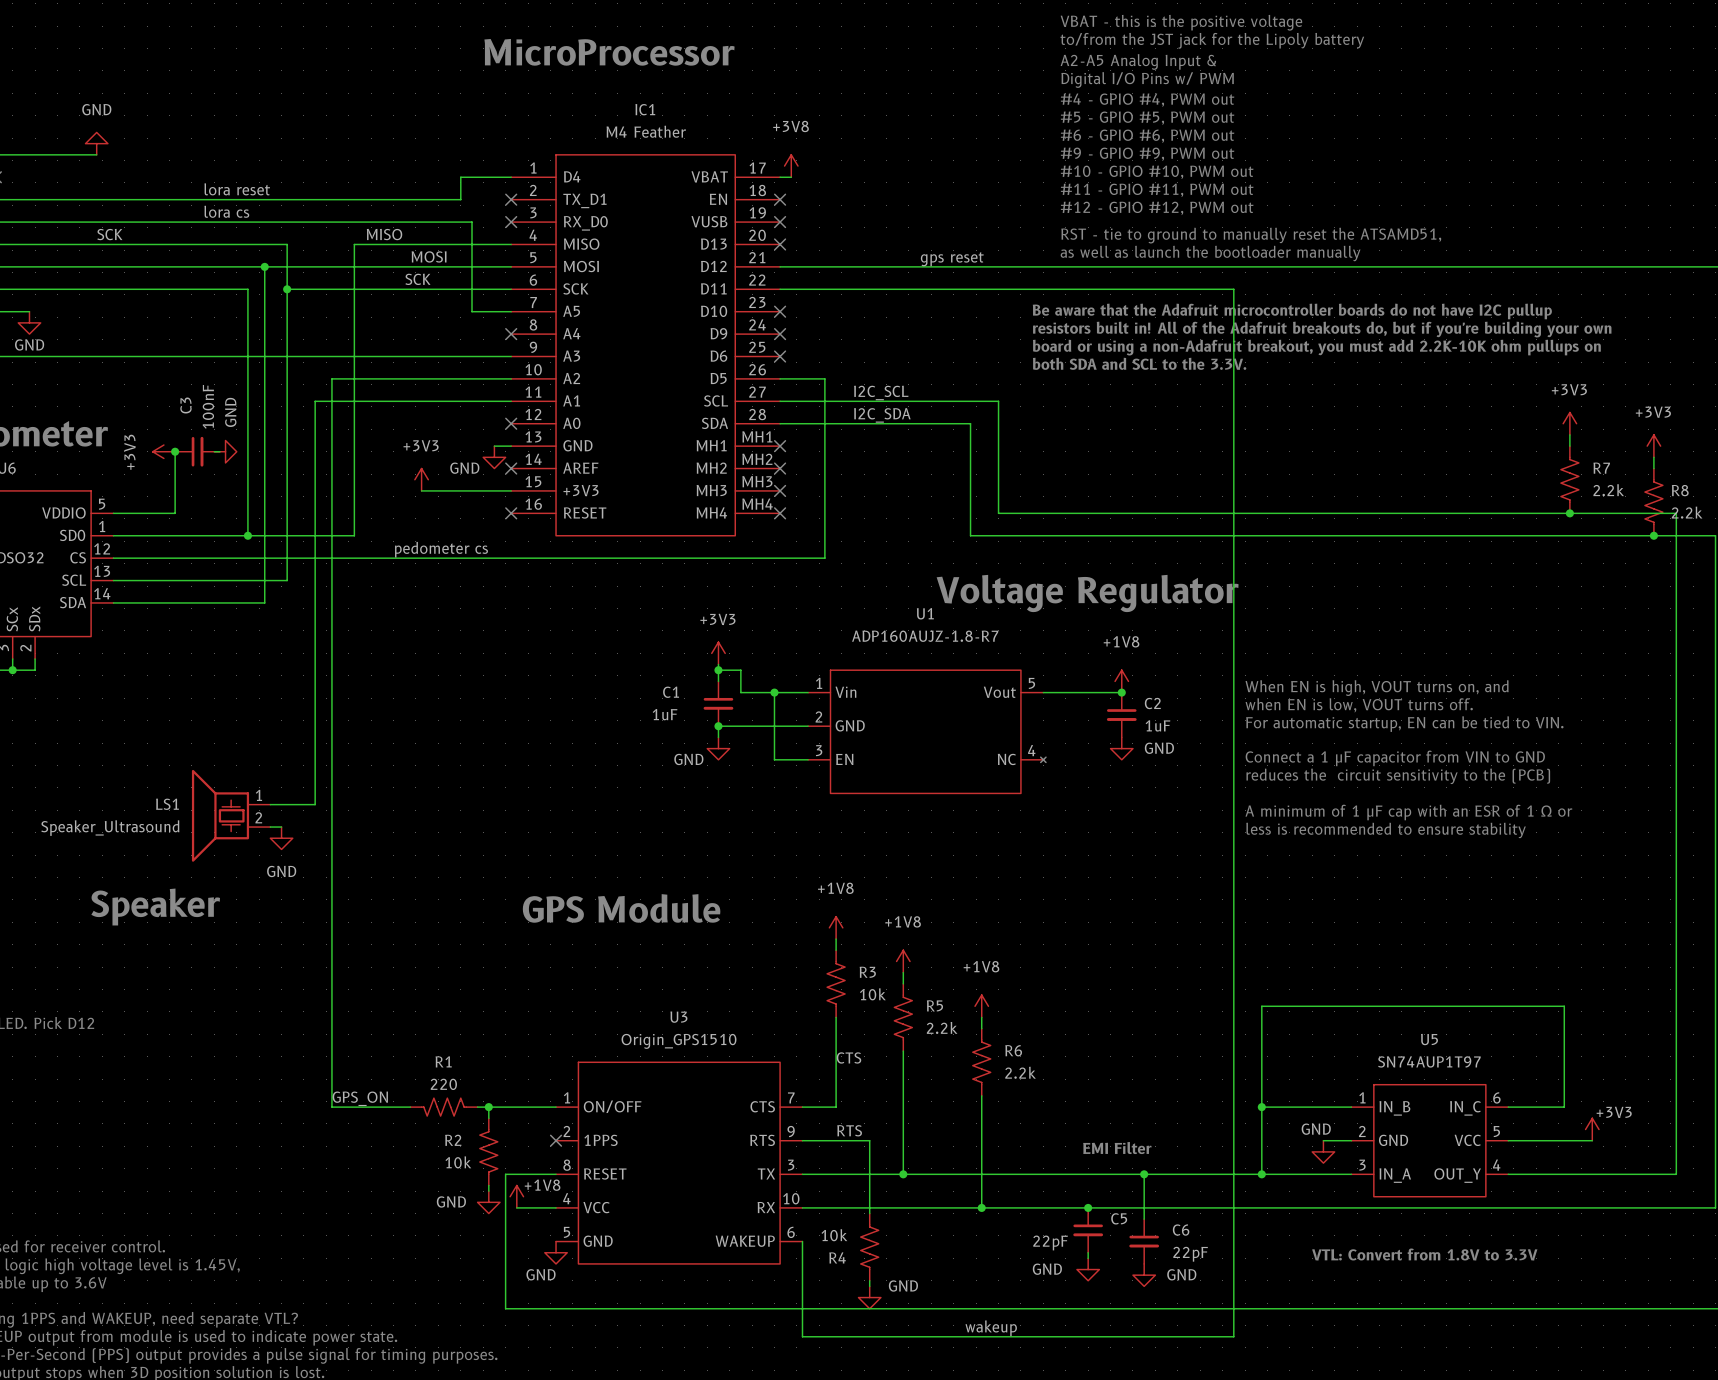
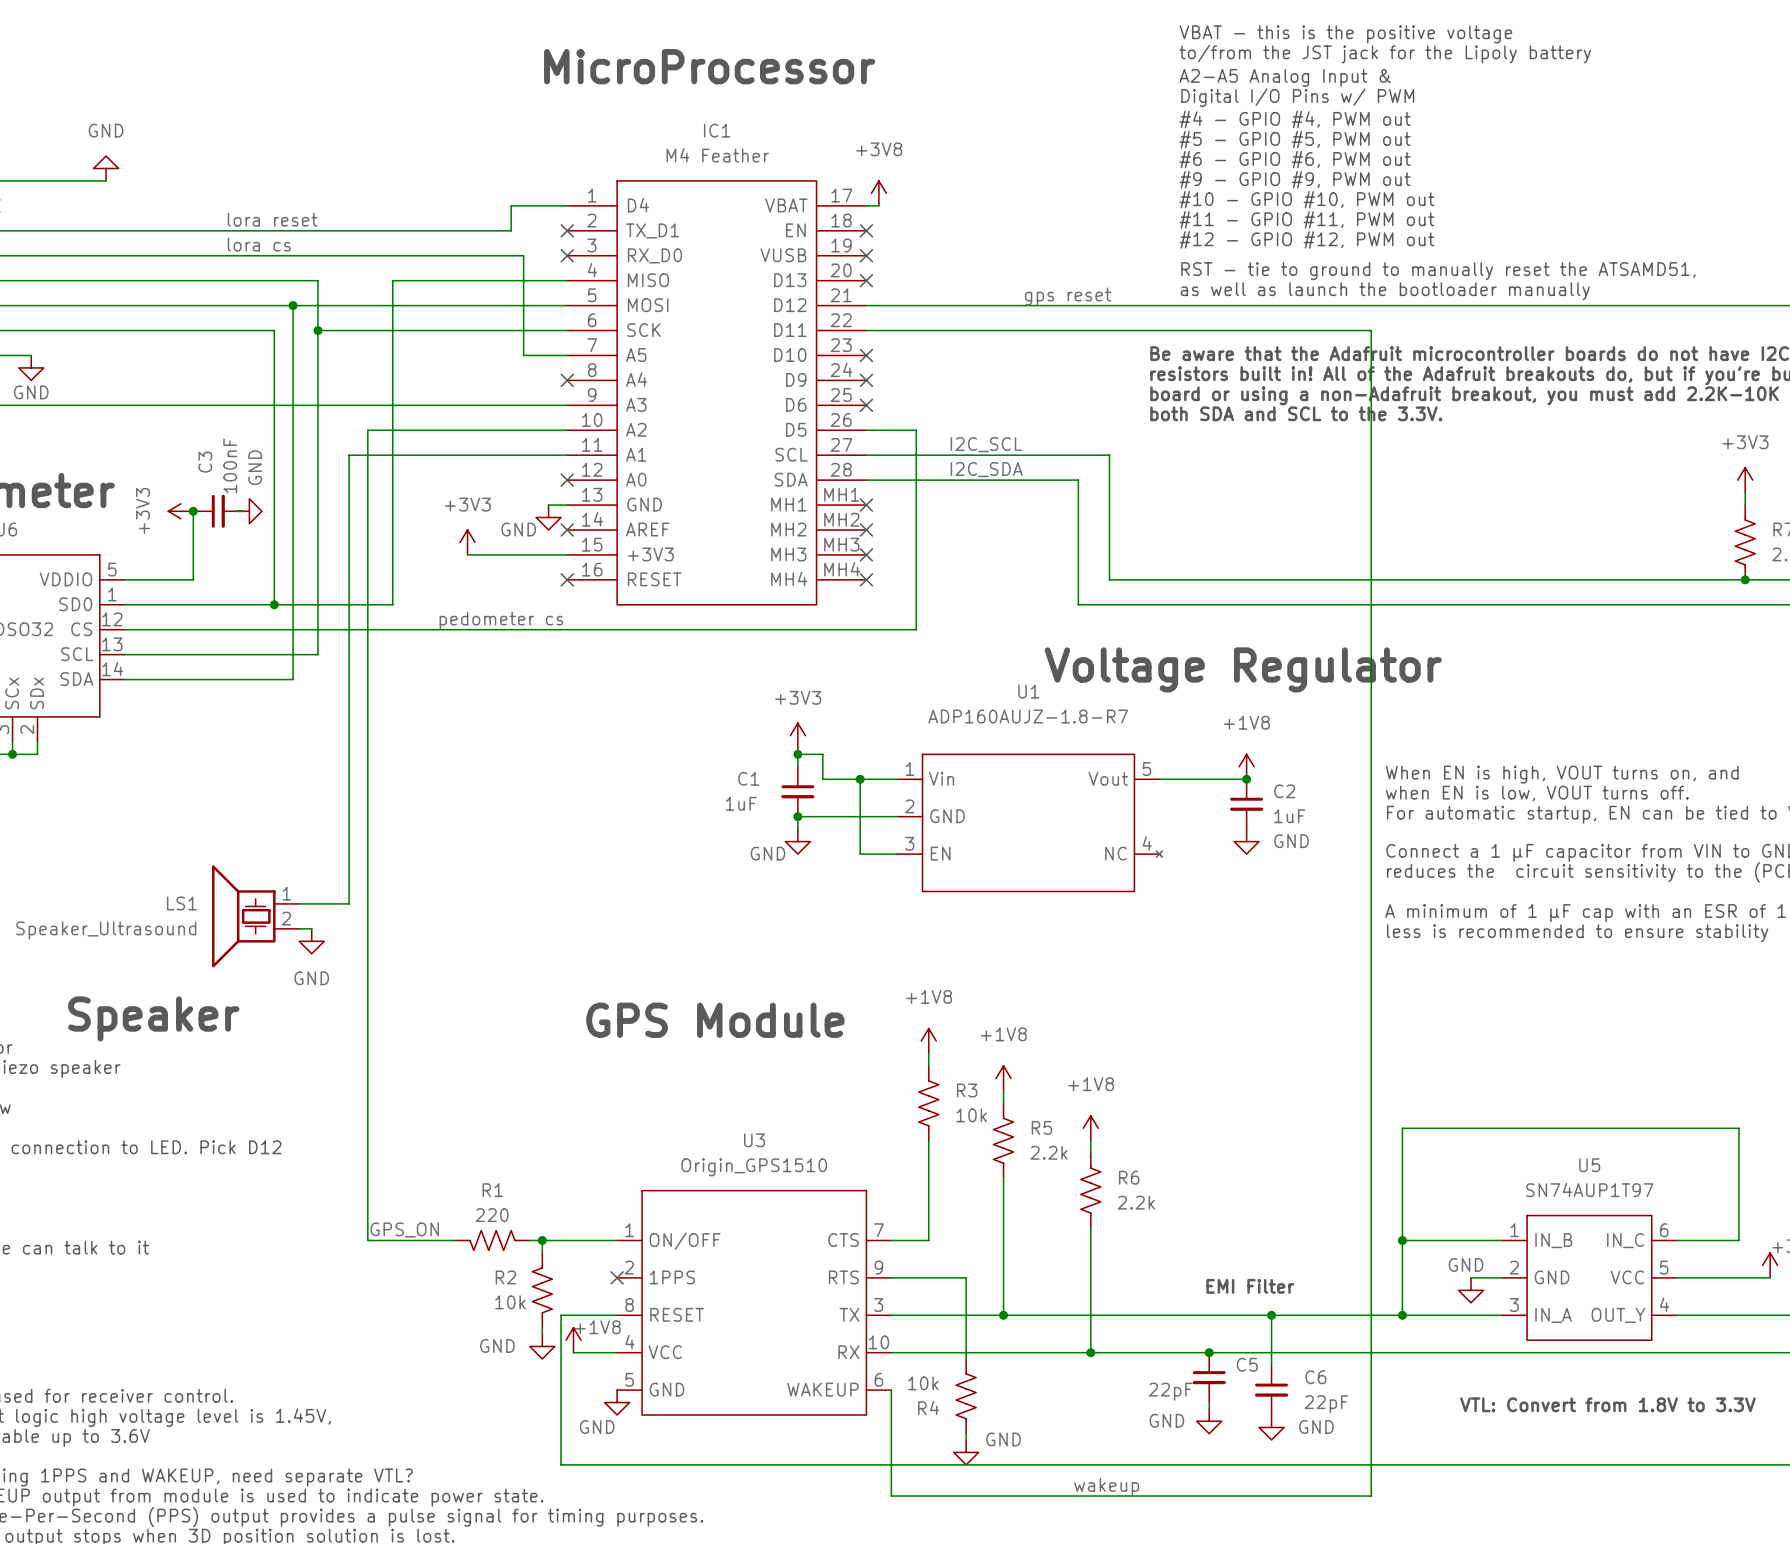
label: SCK (109, 234) -> none
label: MISO (384, 234) -> none
label: MOSI (429, 256) -> none
label: SCK (417, 279) -> none
label: CTS (848, 1057) -> none
label: RTS (849, 1130) -> none

